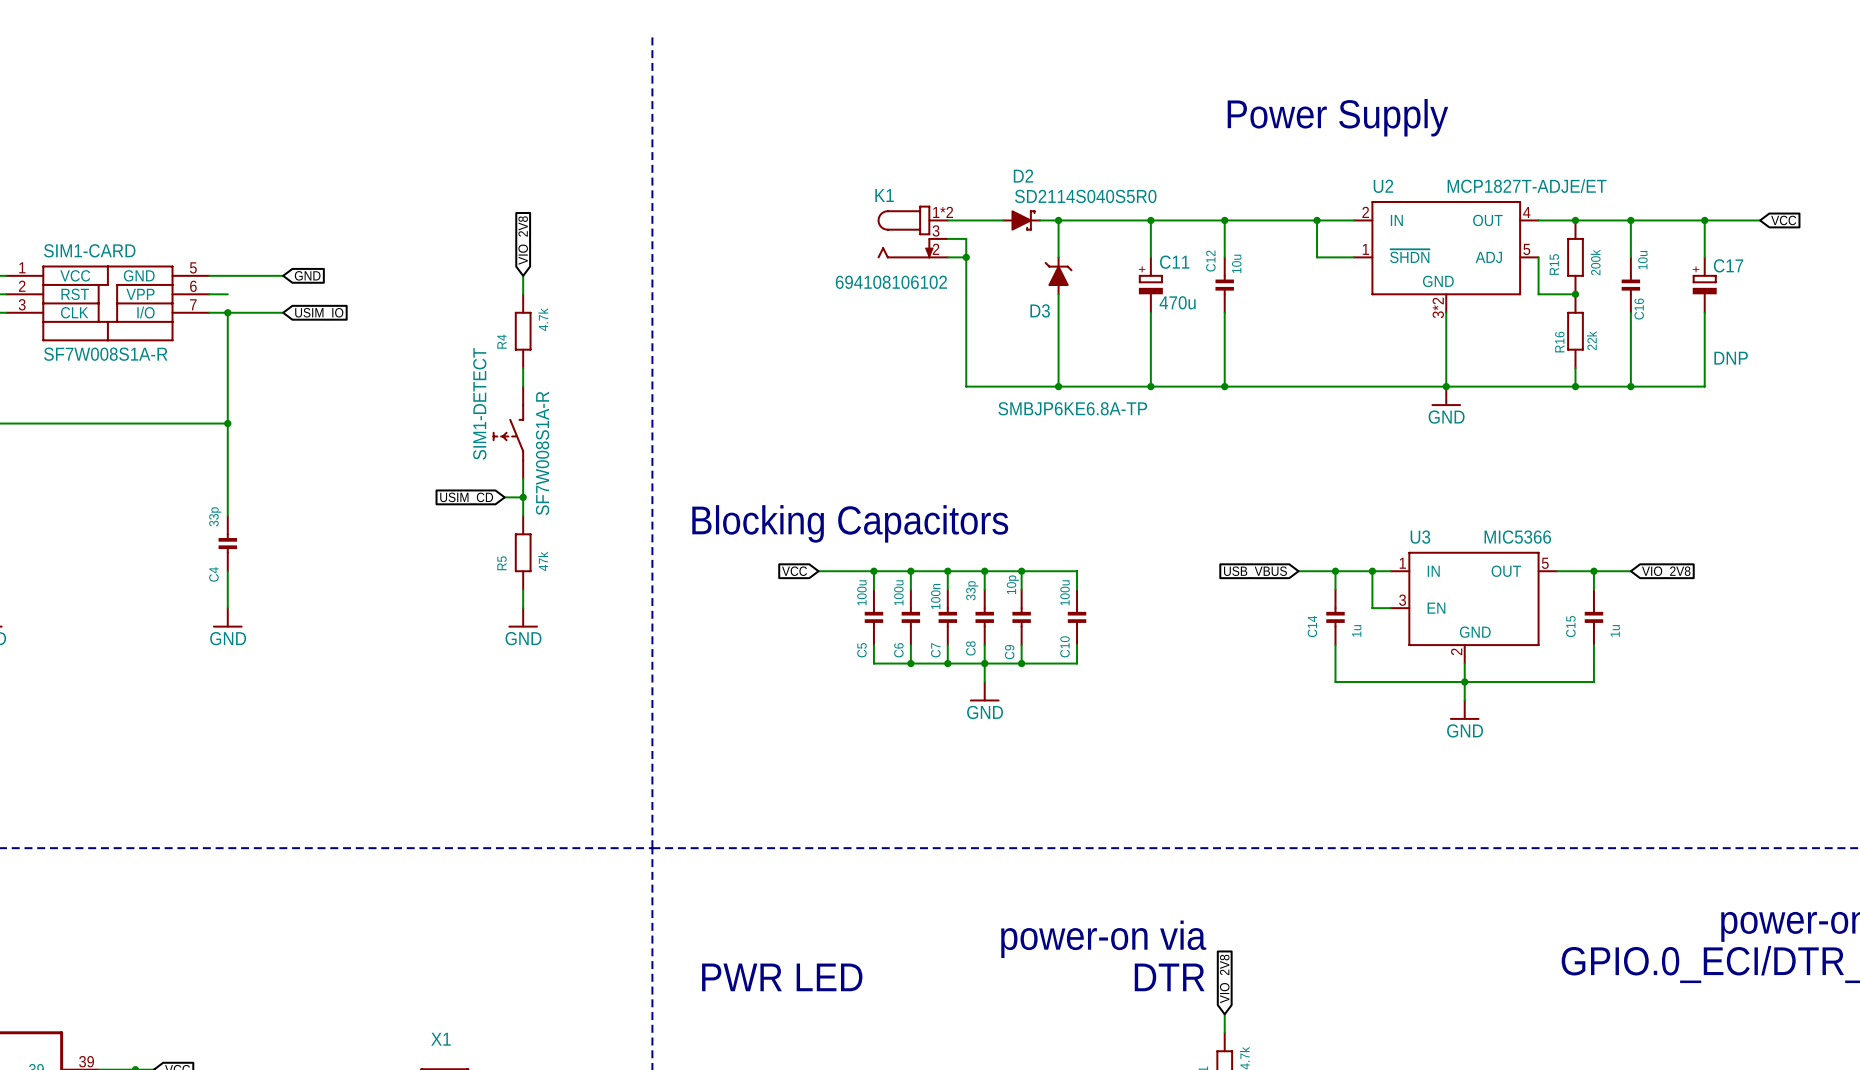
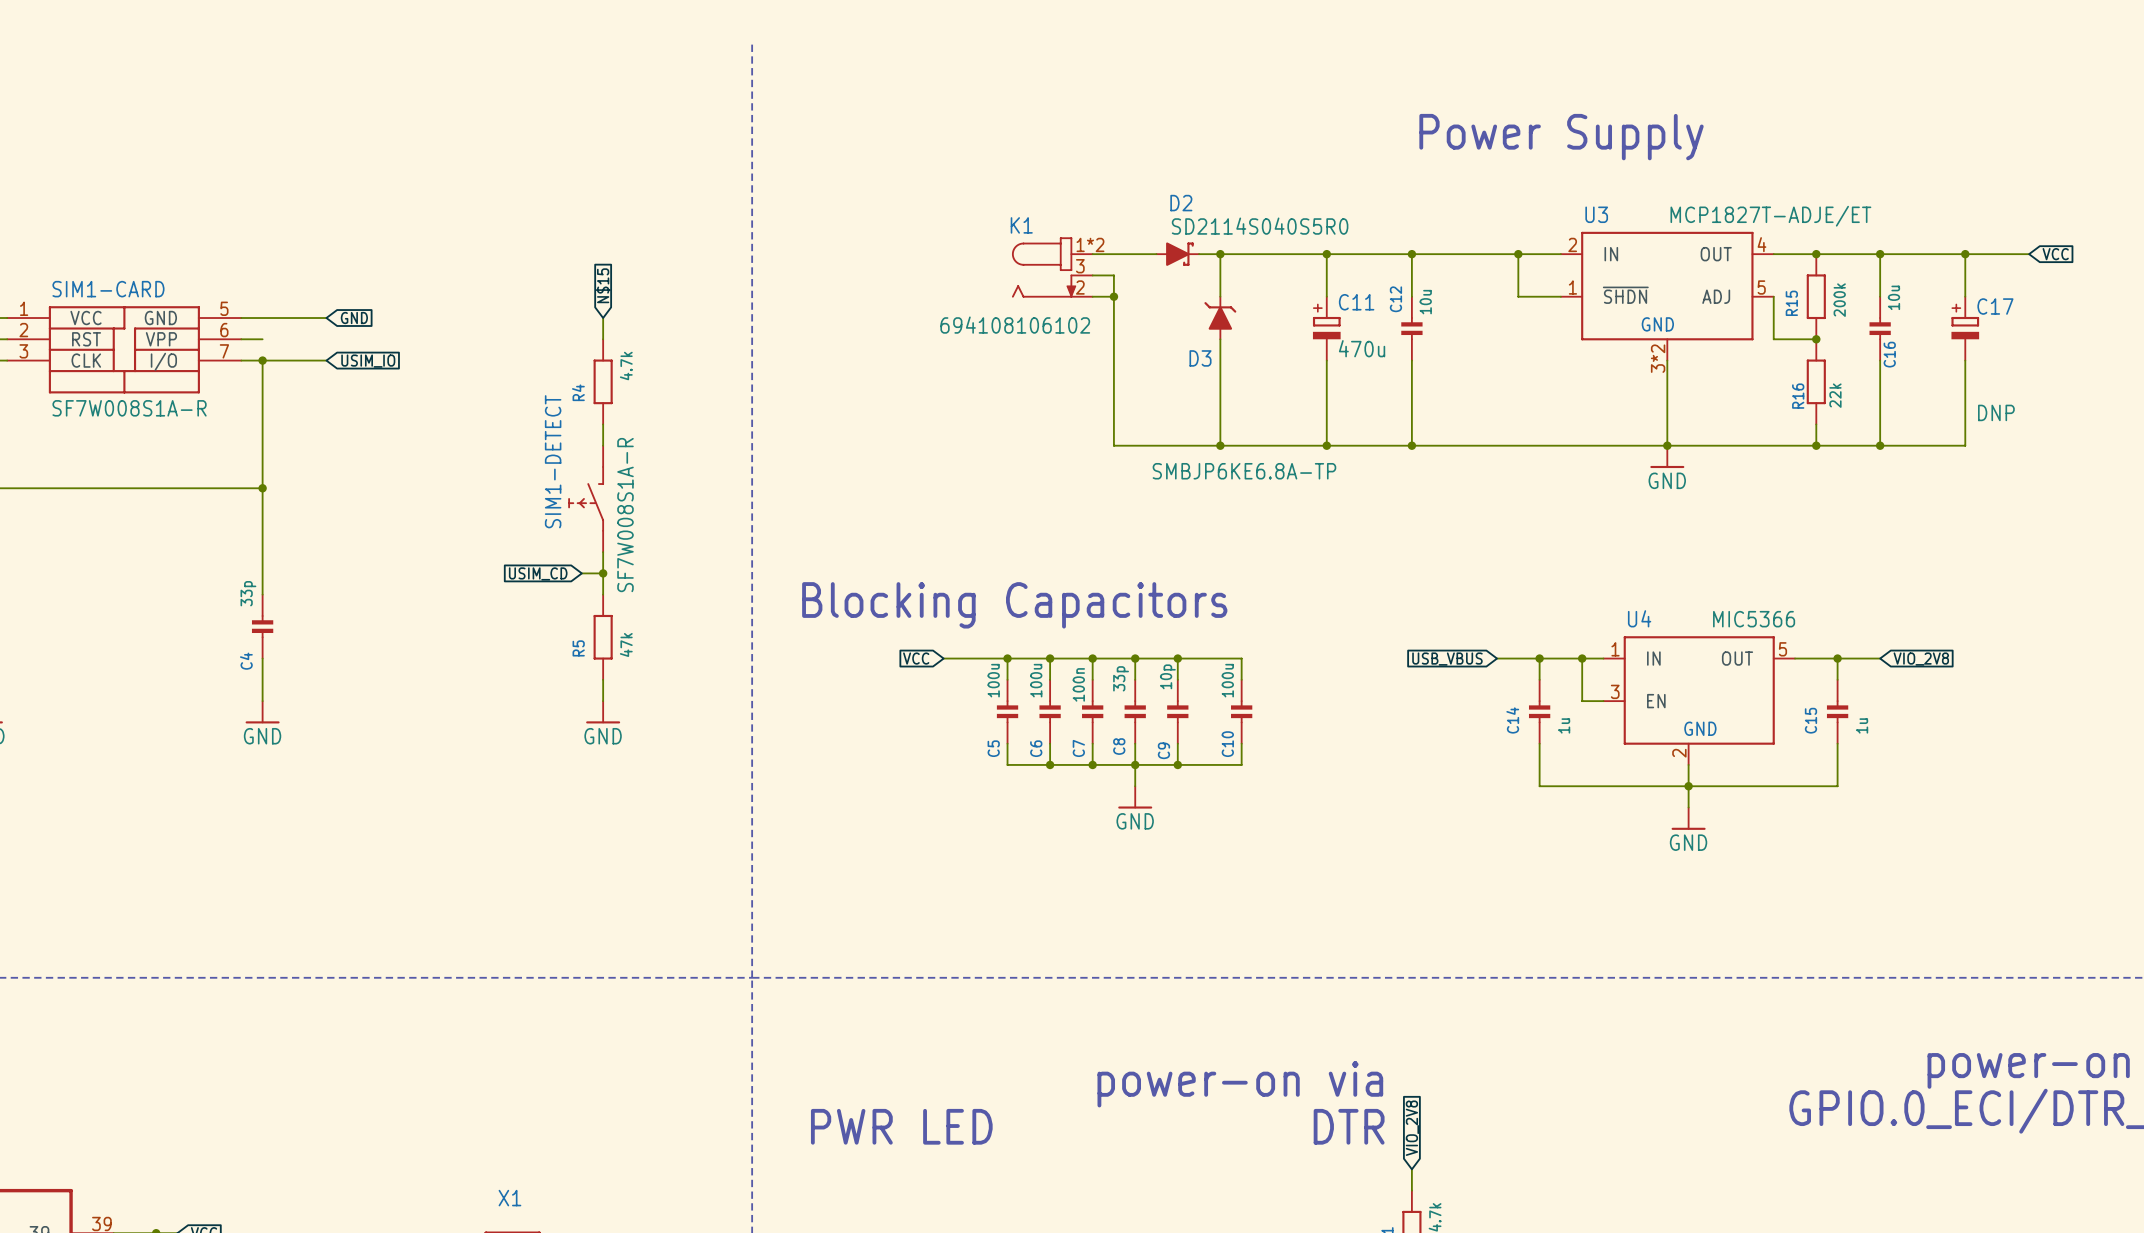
U2 name: U2 (1383, 186) -> U3 (1596, 214)
global label: VIO_2V8 (524, 240) -> N$15 (603, 285)
U3 name: U3 (1420, 537) -> U4 (1639, 618)

